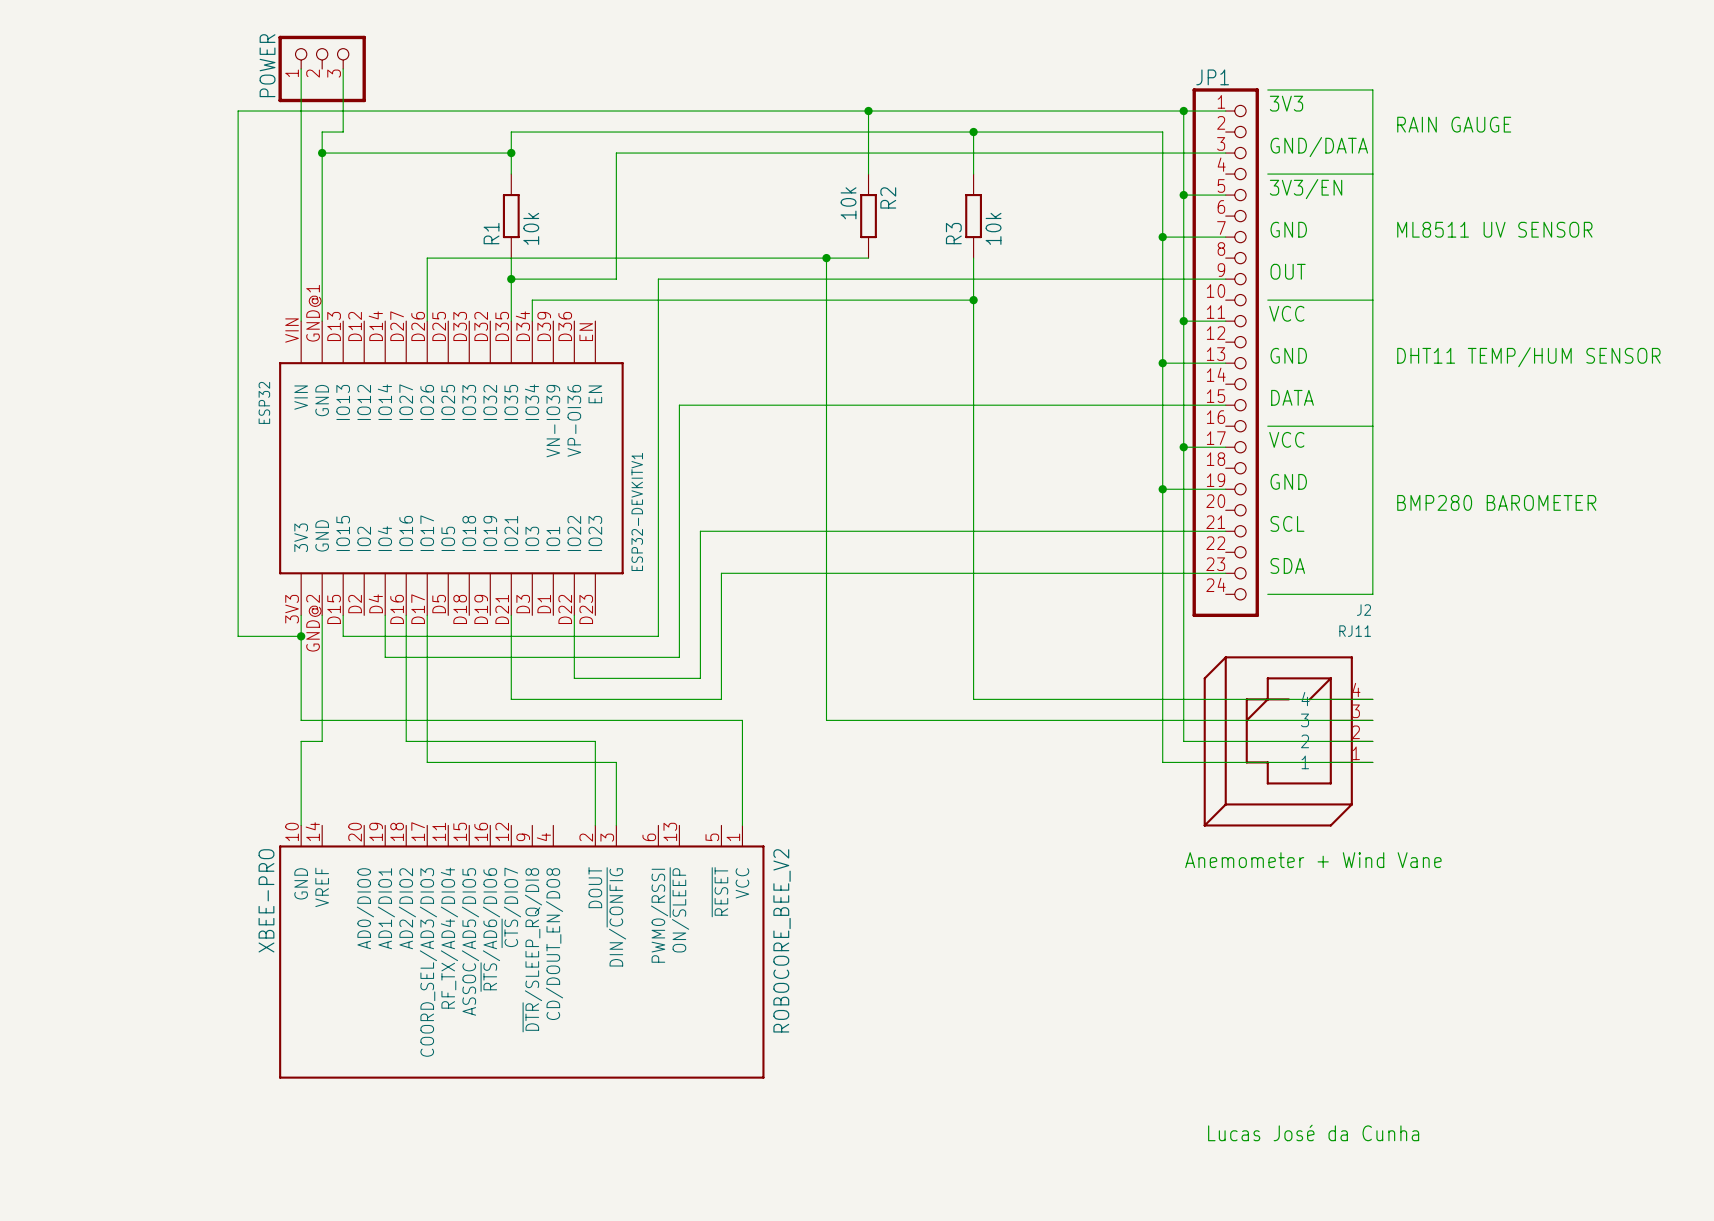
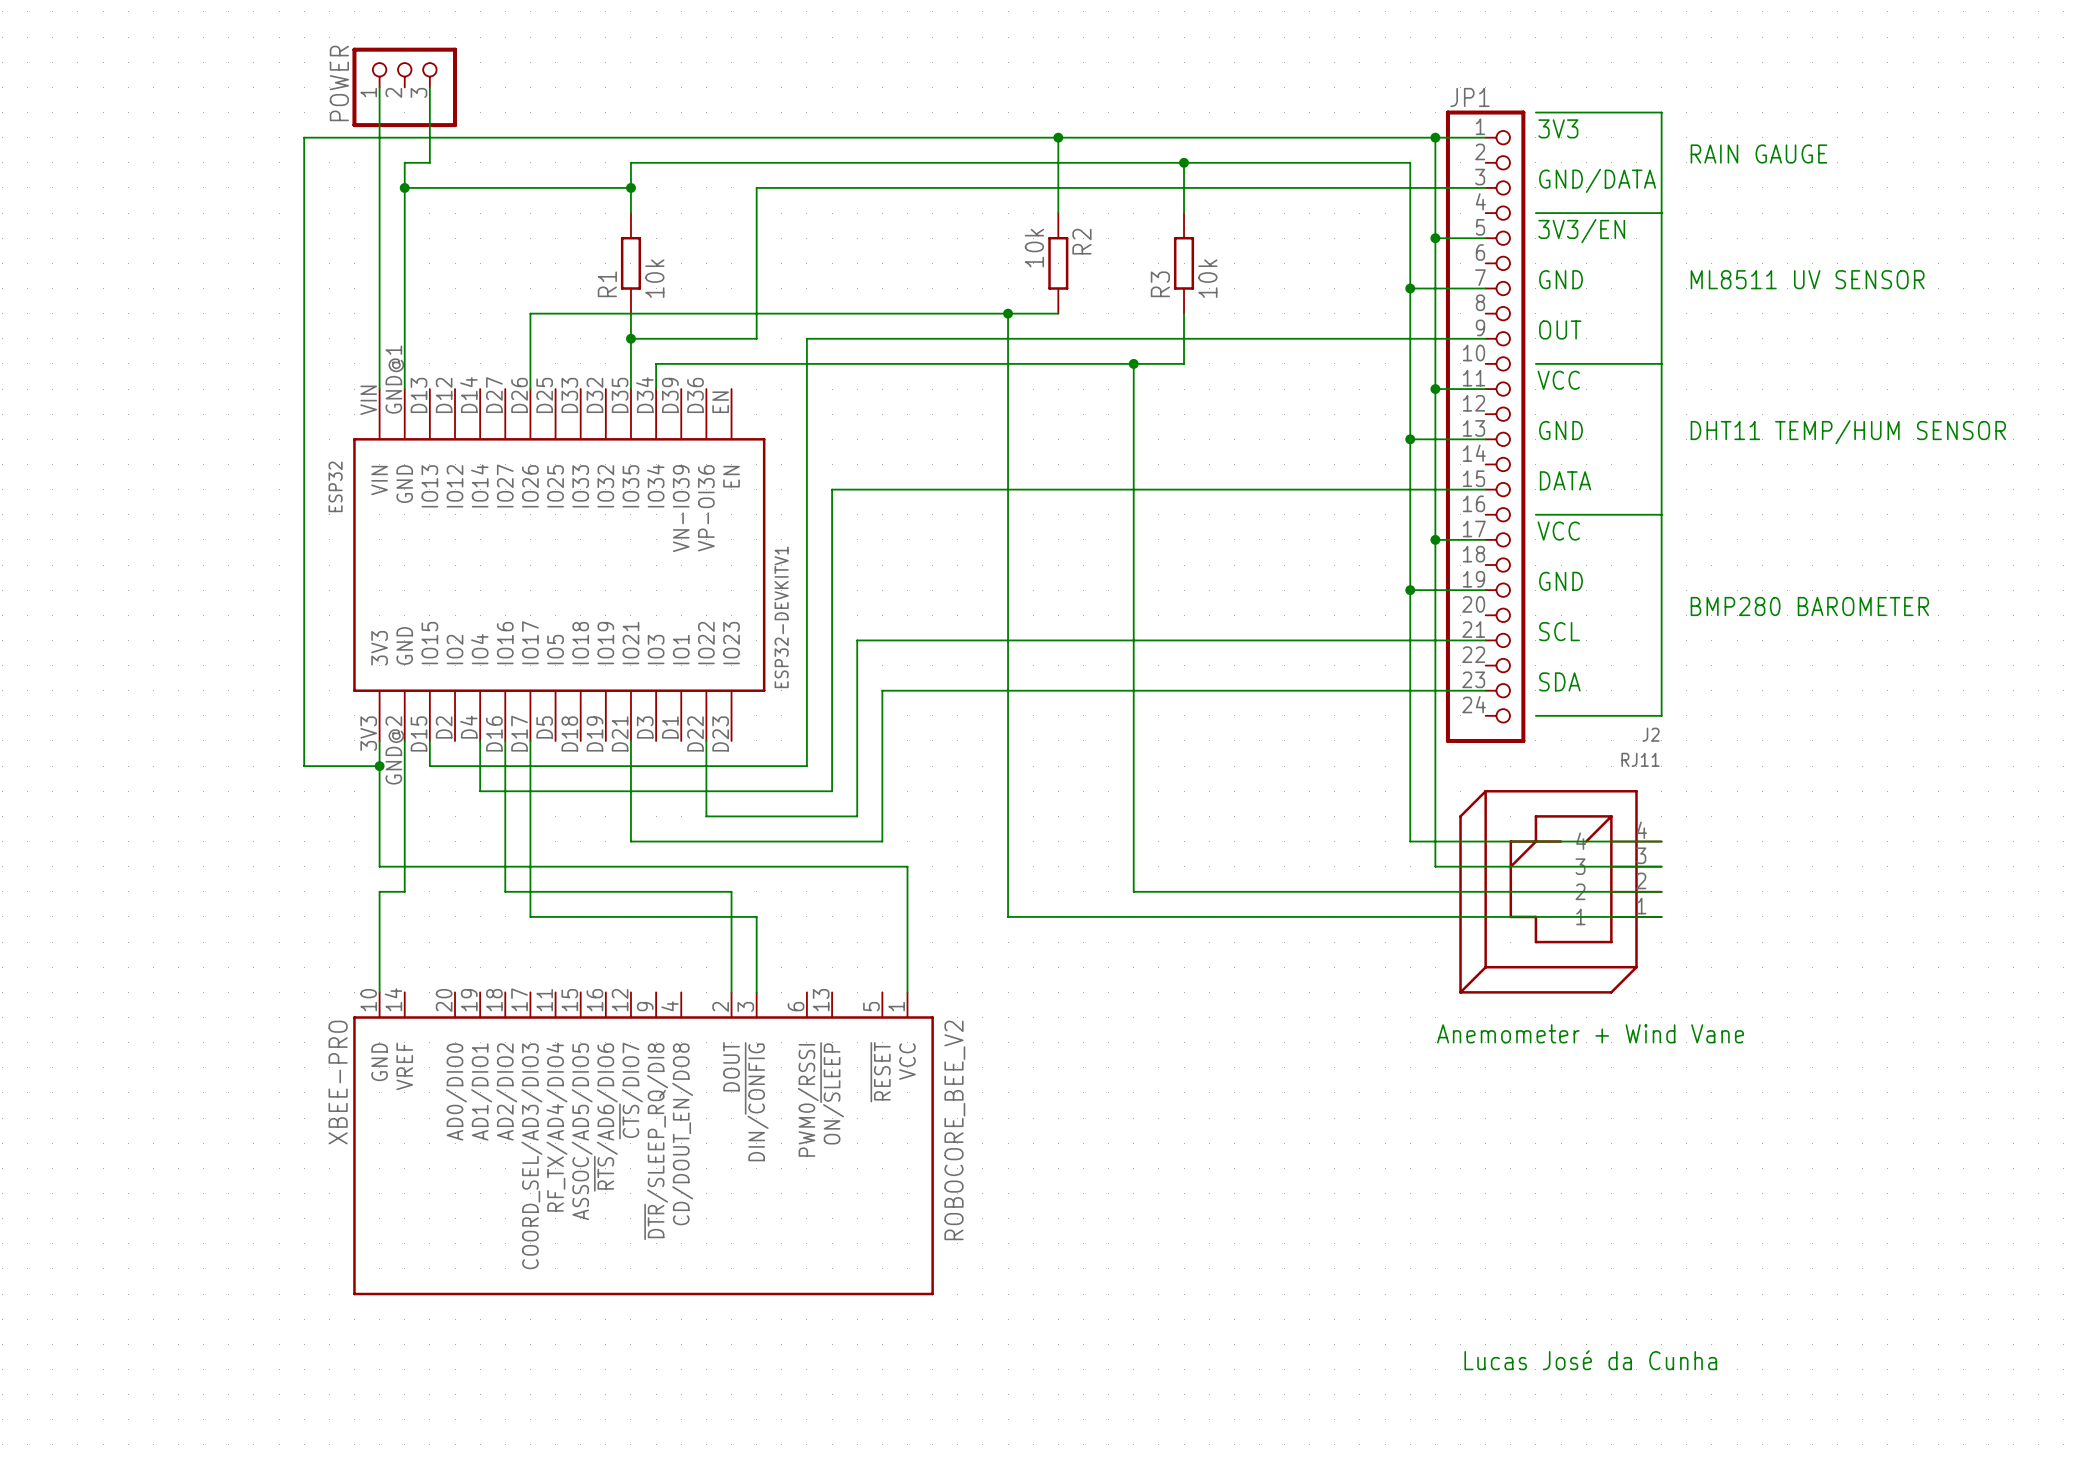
wire: none -> (1133, 363) (1133, 891) (1435, 891)
wire: (973, 300) (973, 699) (1162, 699) (1162, 762) -> none
junction position: (973, 300) -> (1133, 363)
wire: (826, 720) (1183, 720) (1183, 741) -> (1008, 866) (1008, 916) (1410, 916)

